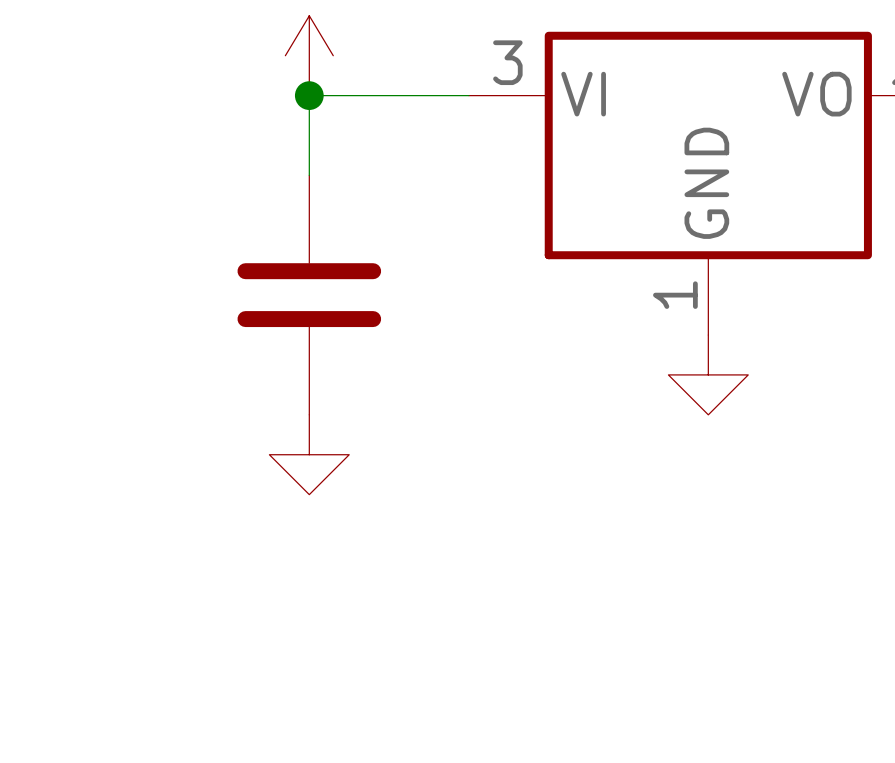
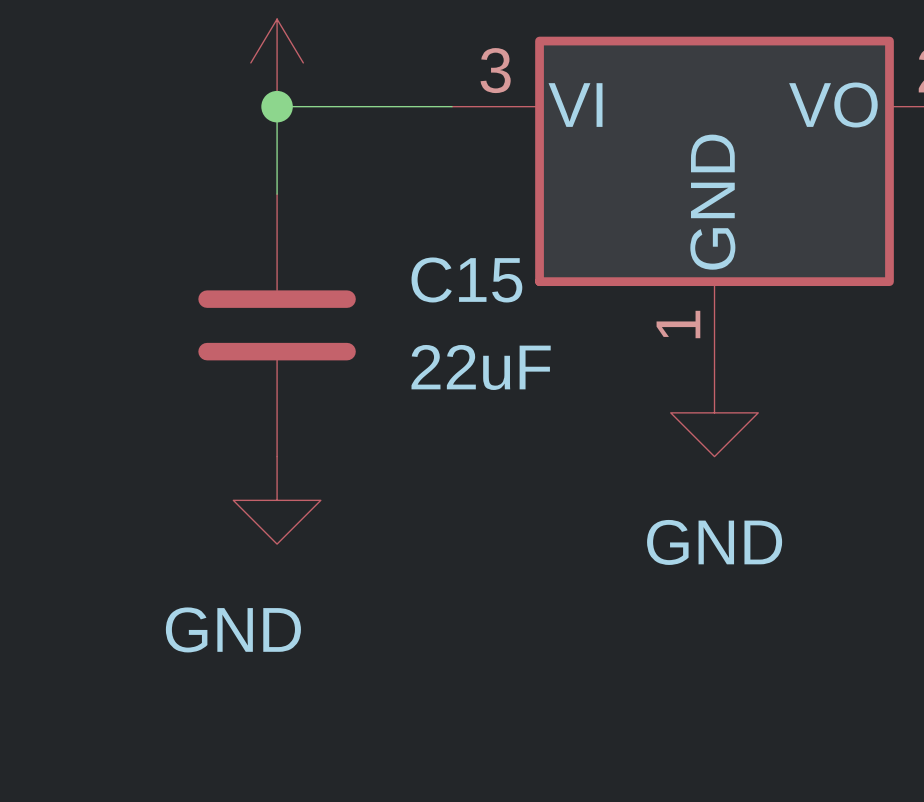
C15 name: none -> C15 (466, 279)
C15 value: none -> 22uF (481, 367)
power symbol text: none -> GND (714, 542)
power symbol text: none -> GND (233, 629)

